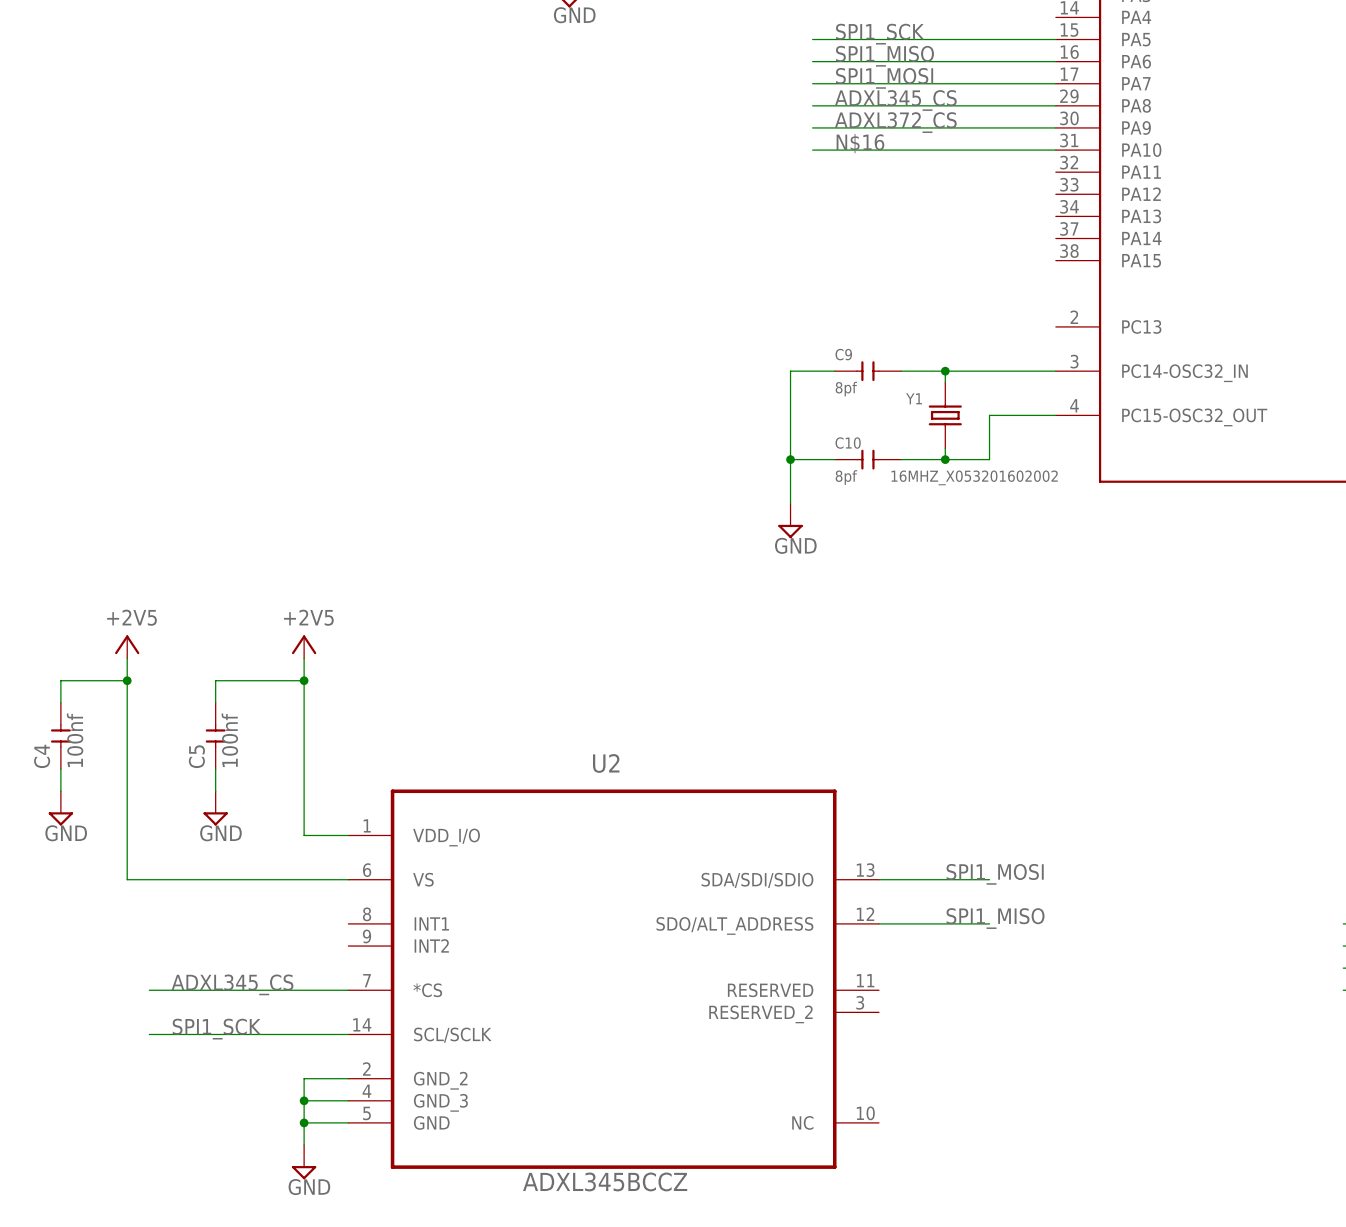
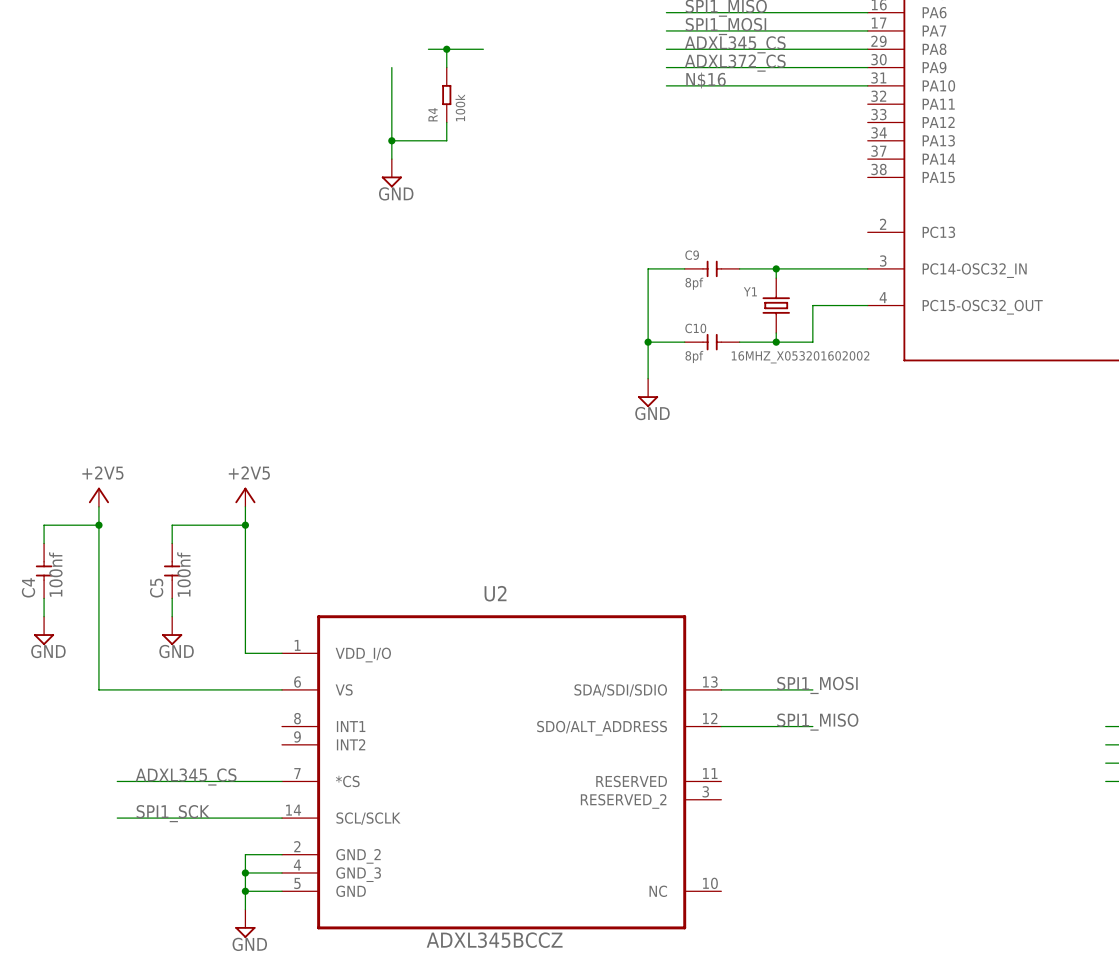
wire: none -> (428, 49) (483, 49)
wire: none -> (446, 49) (446, 67)
junction: none -> (446, 49)
wire: none -> (391, 67) (391, 159)
R4: none -> 100k (446, 95)
wire: none -> (446, 122) (446, 140) (391, 140)
junction: none -> (391, 140)
power symbol: none -> GND (391, 173)

